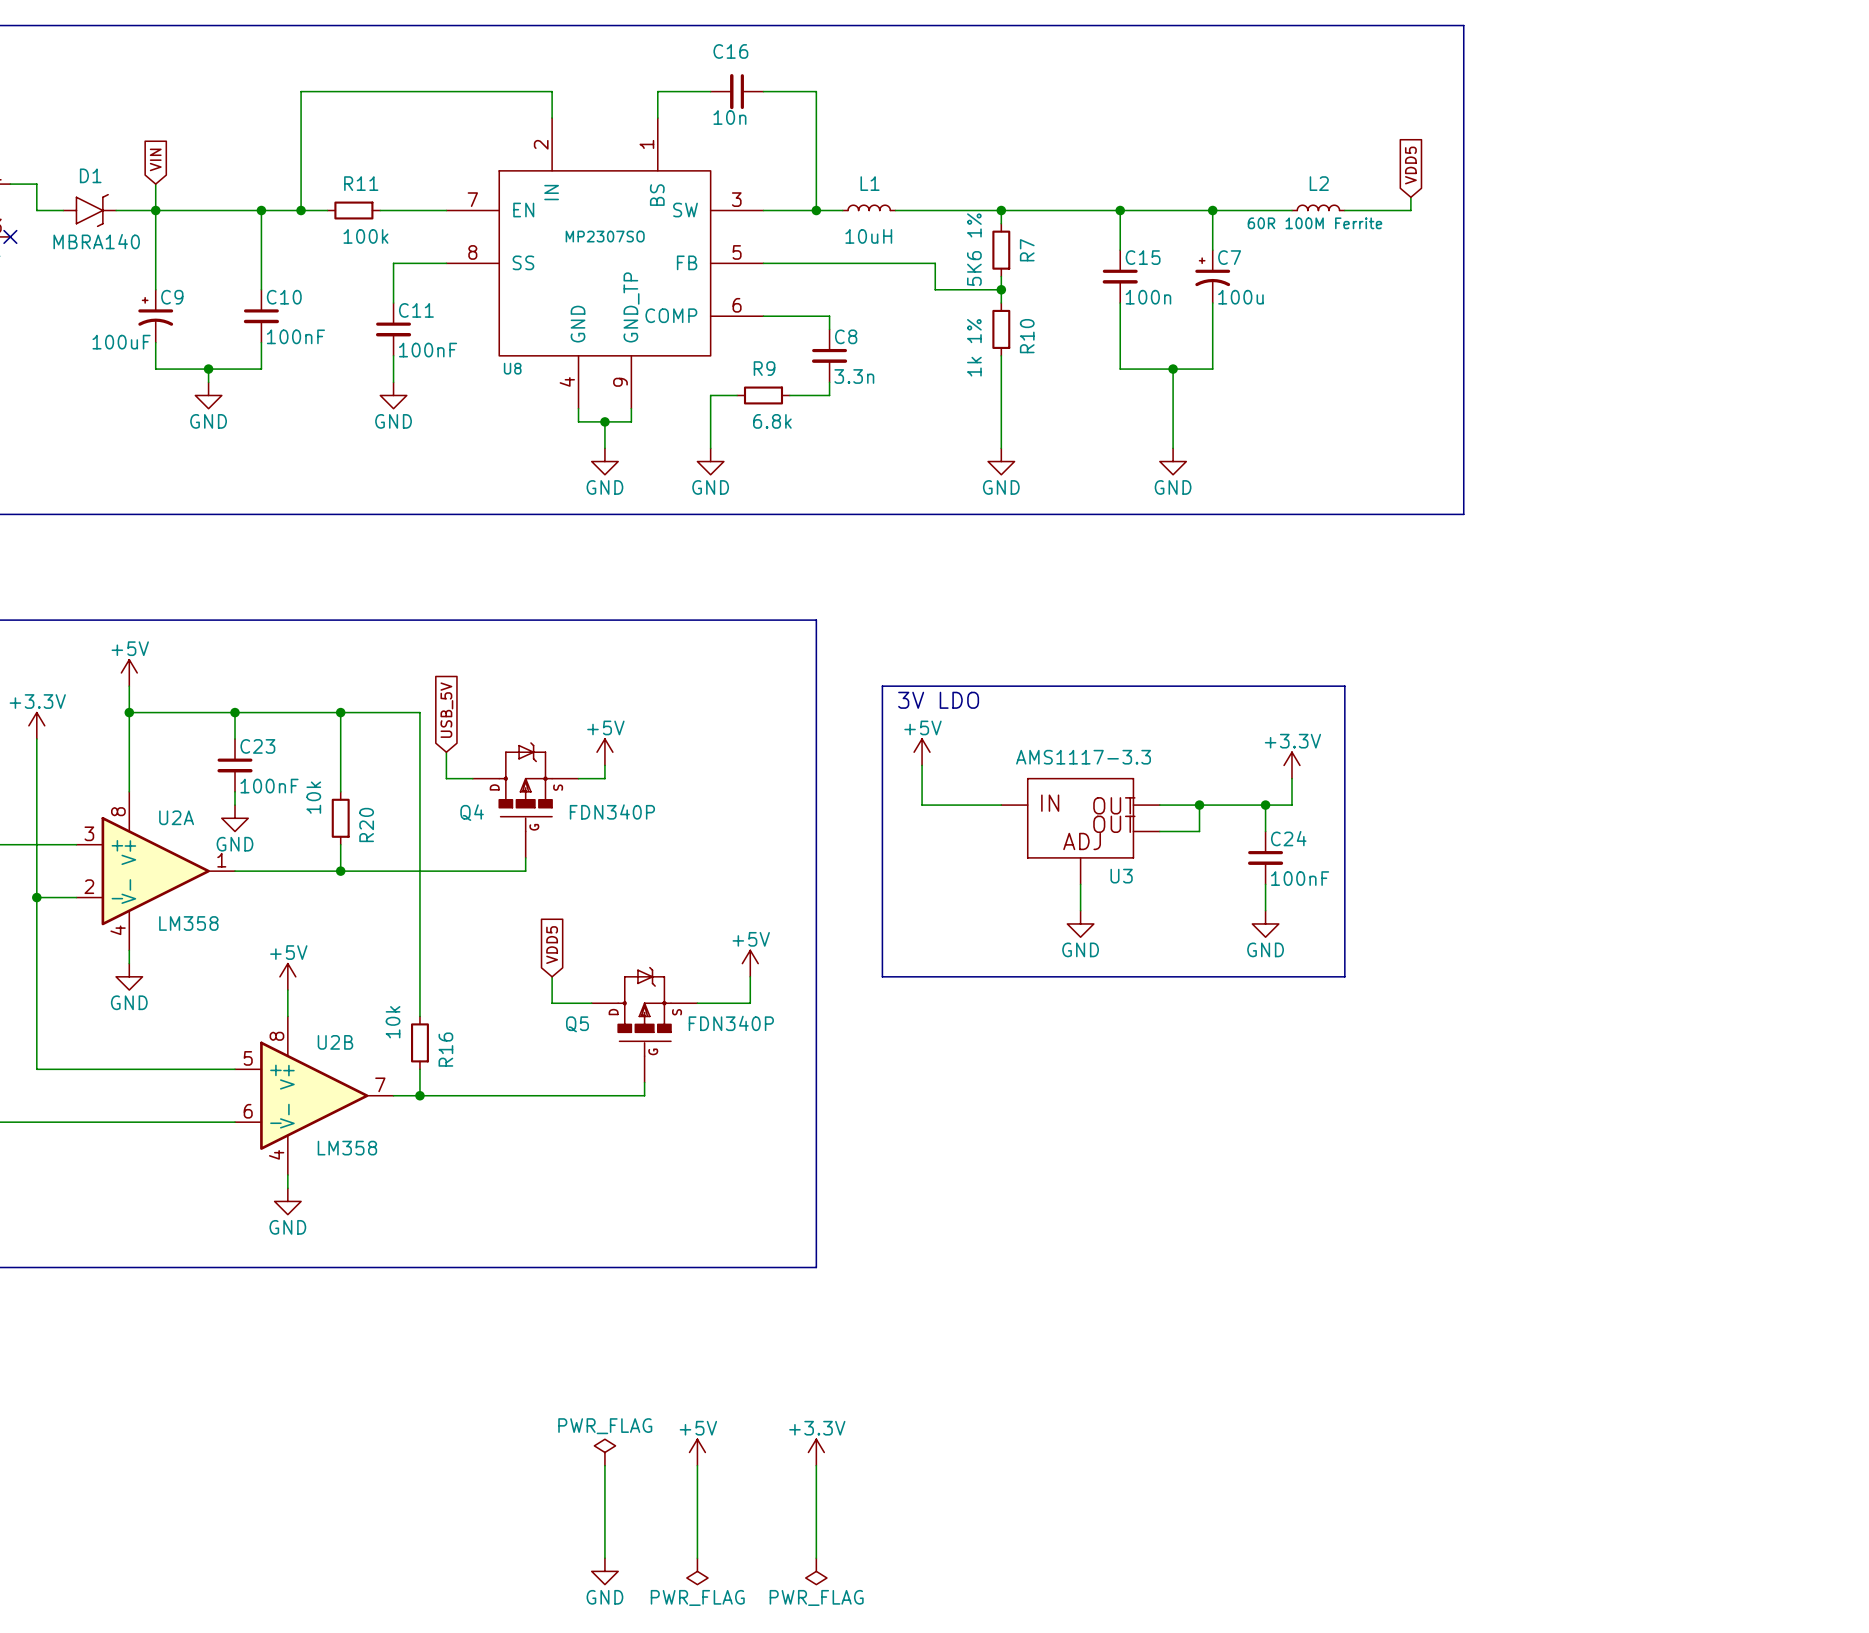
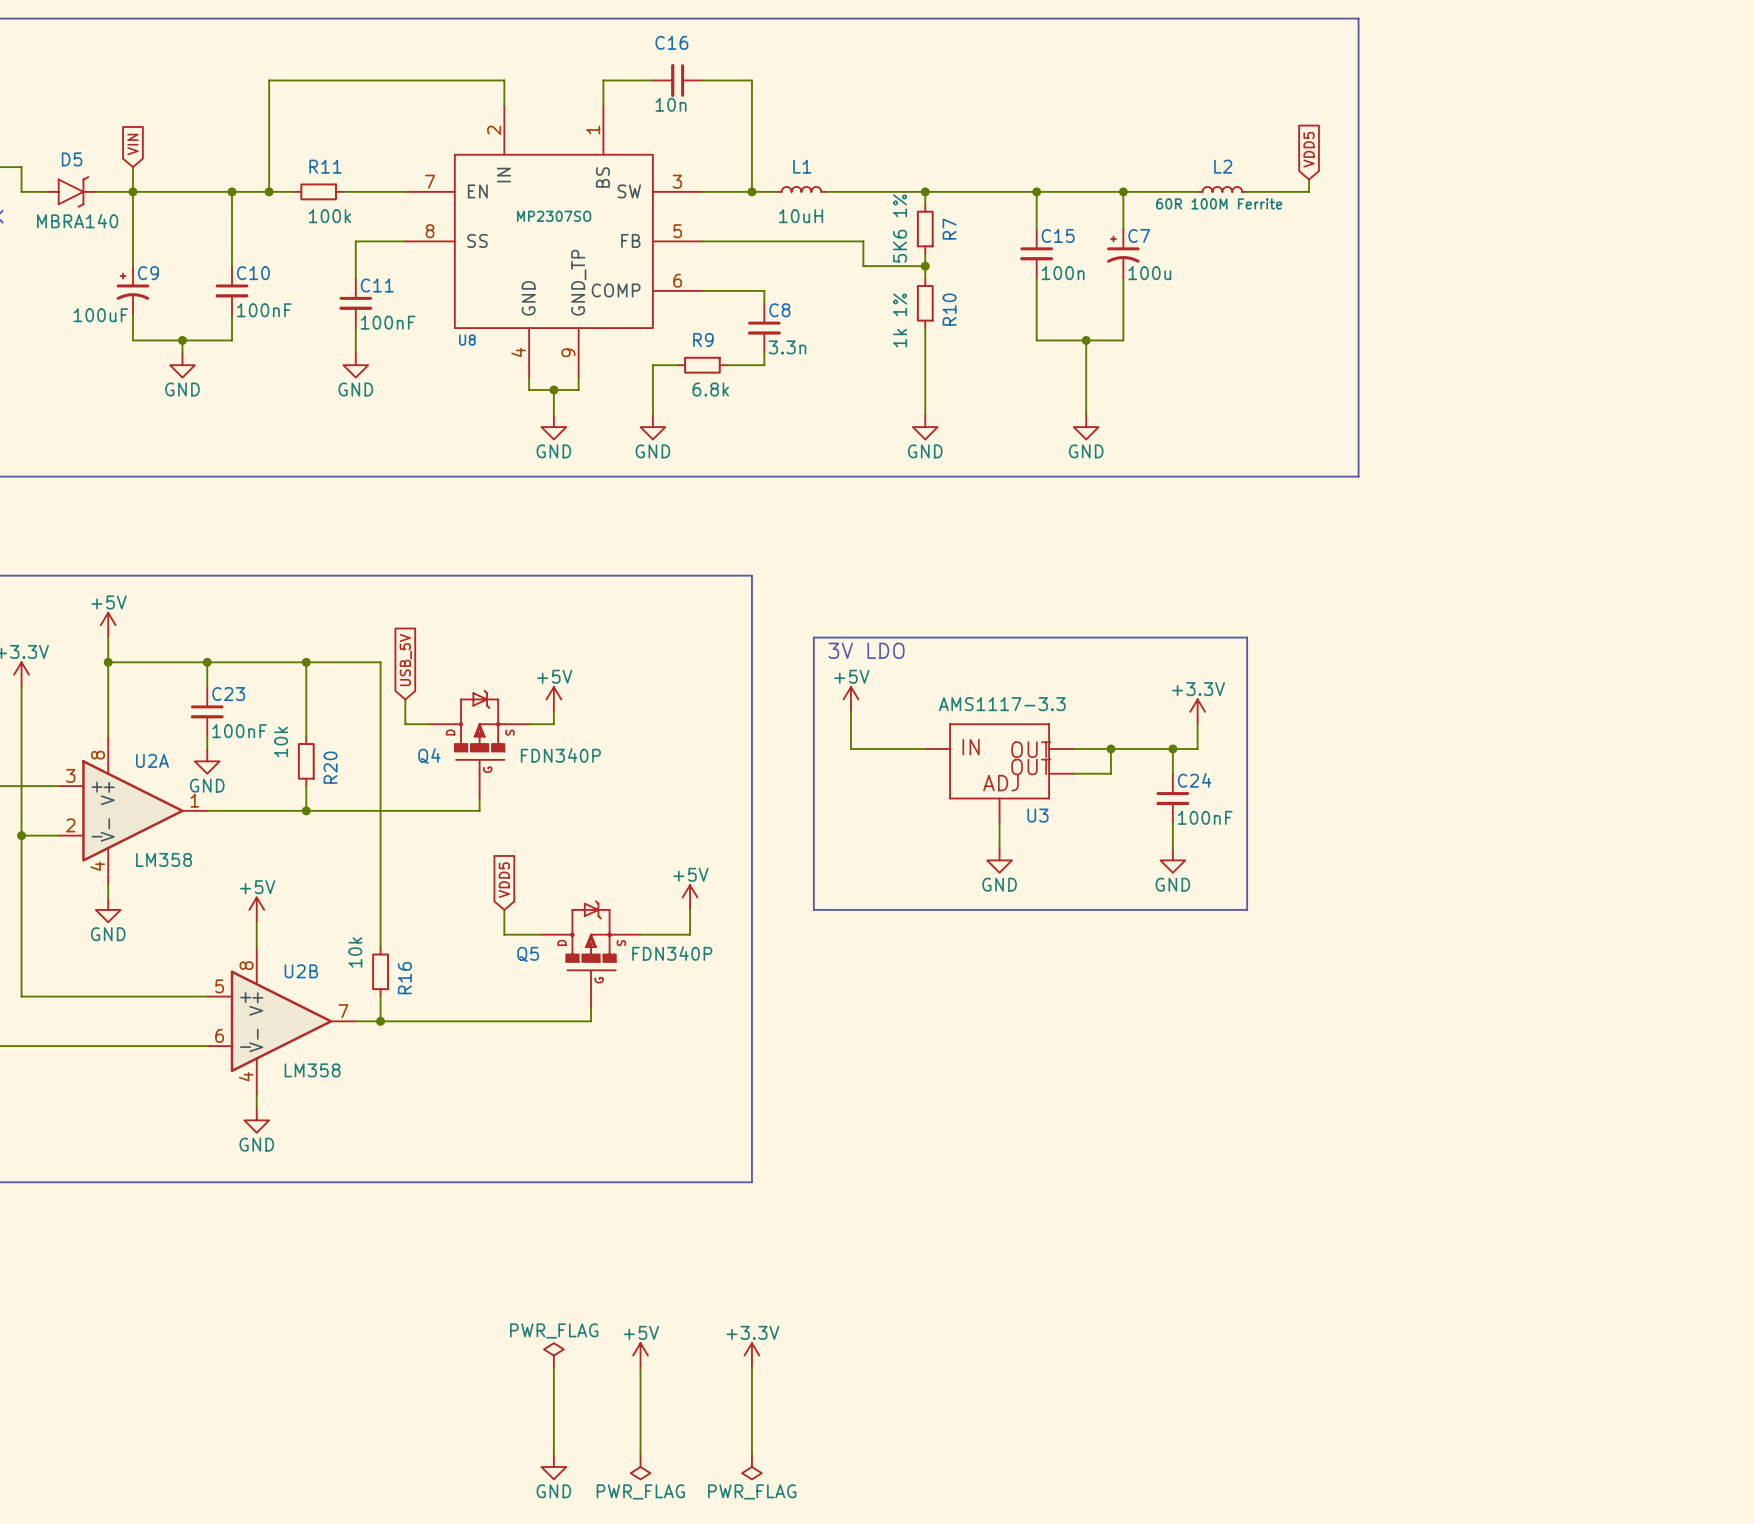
D1 name: D1 (90, 175) -> D5 (72, 159)

